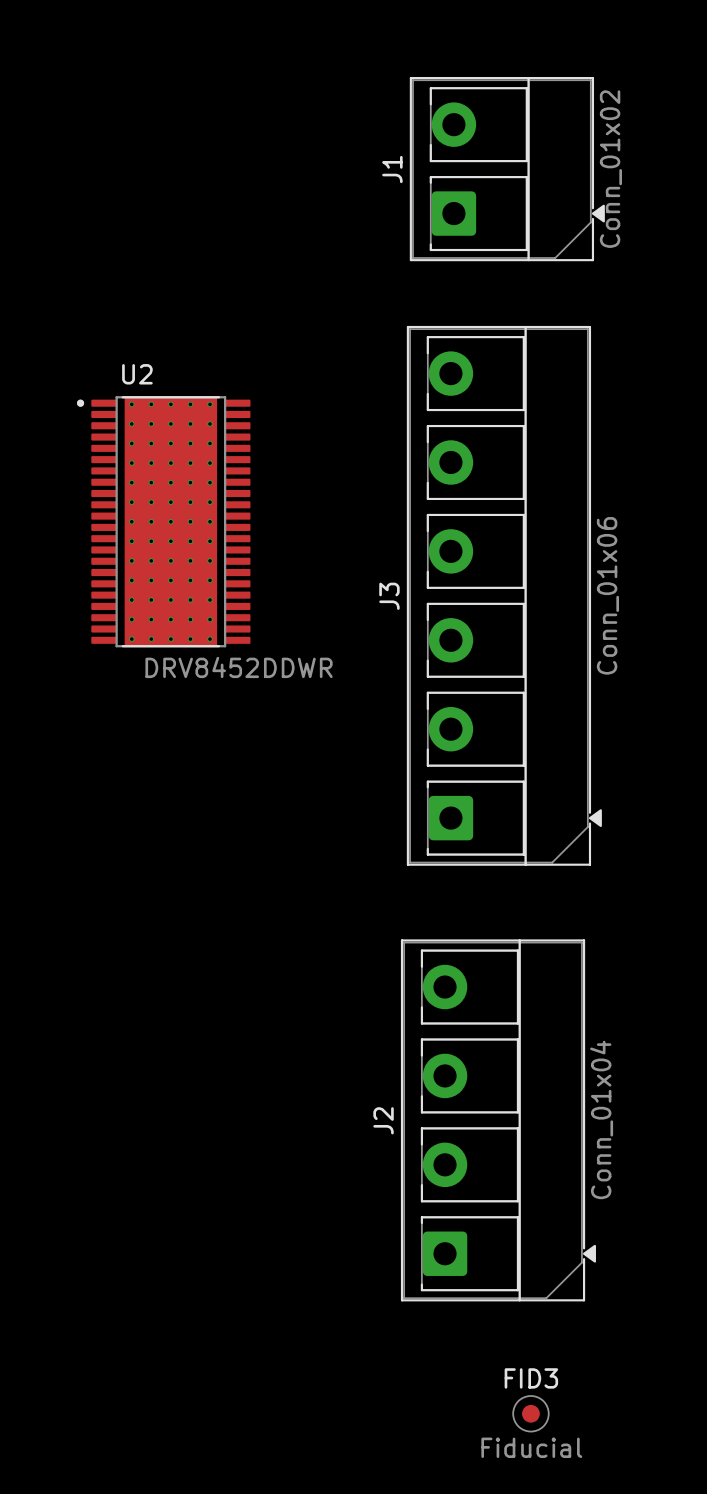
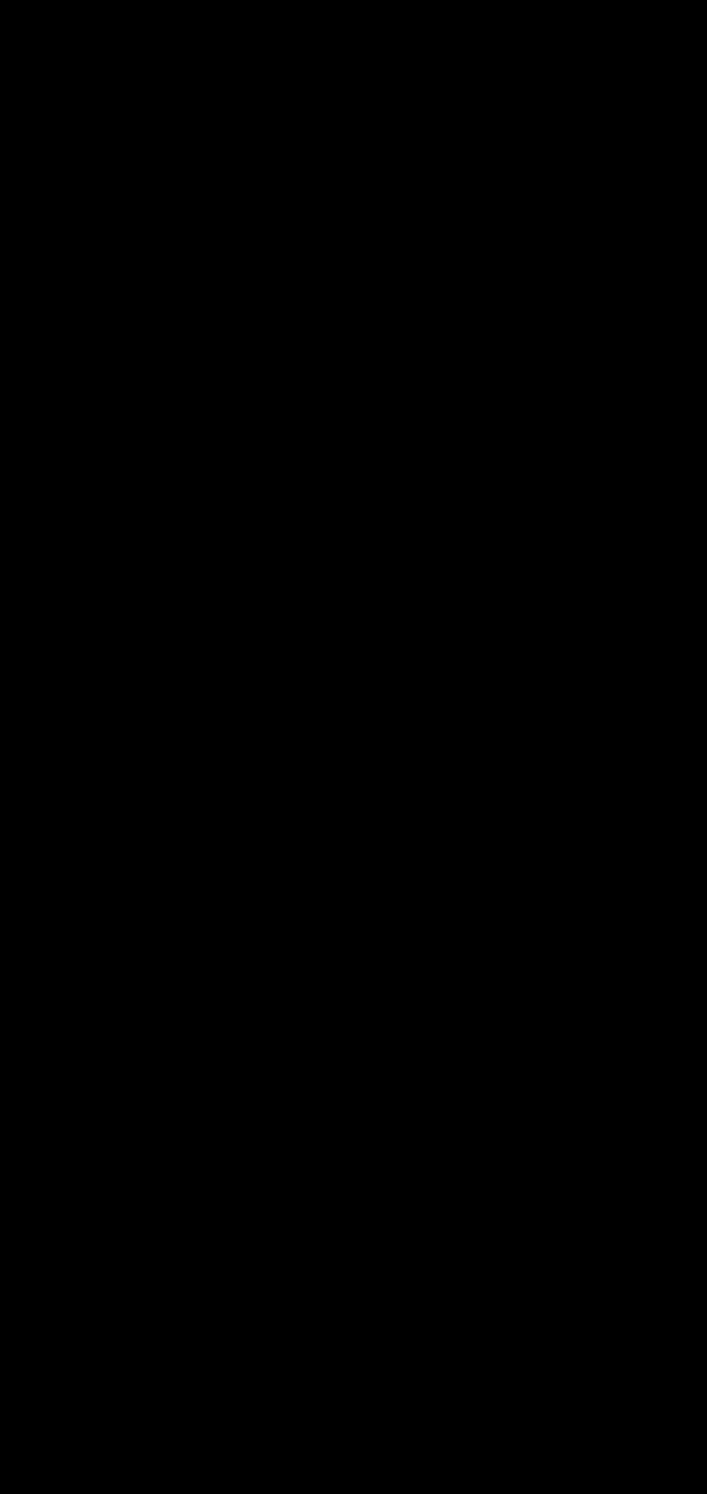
J1: Conn_01x02 (507, 169) -> none
U2: DRV8452DDWR (163, 521) -> none
J3: Conn_01x06 (504, 595) -> none
J2: Conn_01x04 (498, 1120) -> none
FID3: Fiducial (530, 1413) -> none

